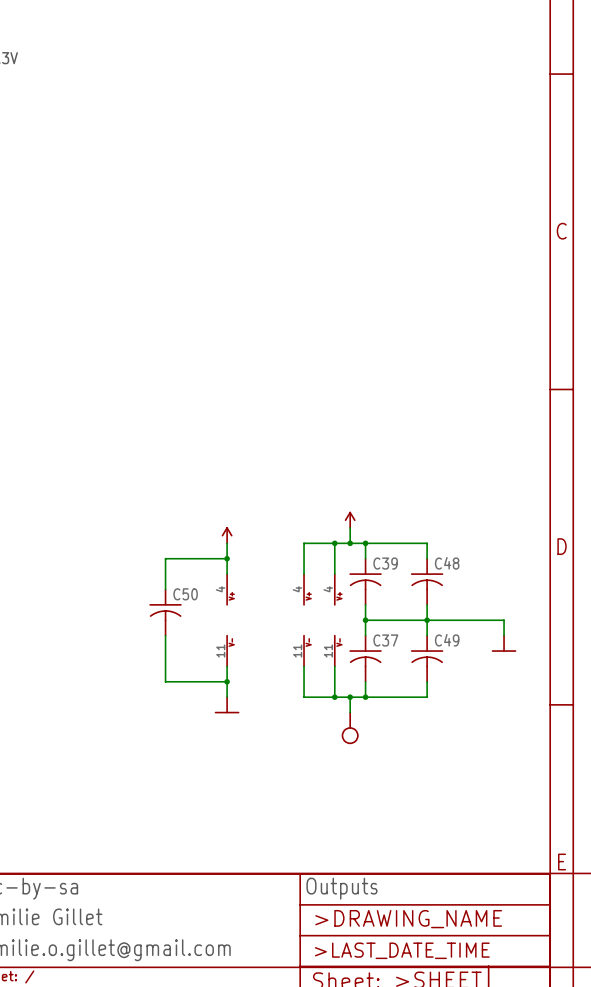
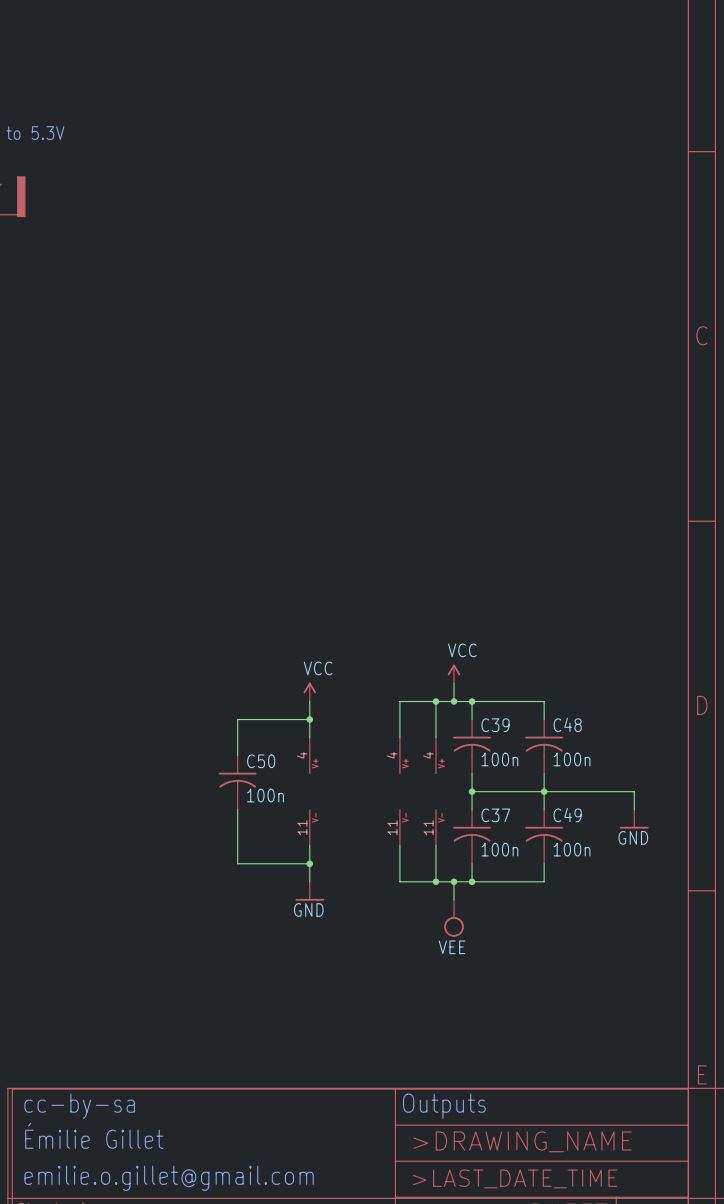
power symbol text: none -> VCC (462, 650)
power symbol text: none -> VCC (318, 668)
C39 value: none -> 100n (499, 759)
C48 value: none -> 100n (571, 759)
C50 value: none -> 100n (265, 795)
power symbol text: none -> GND (633, 837)
C37 value: none -> 100n (499, 849)
C49 value: none -> 100n (571, 849)
power symbol text: none -> GND (308, 910)
power symbol text: none -> VEE (452, 947)

